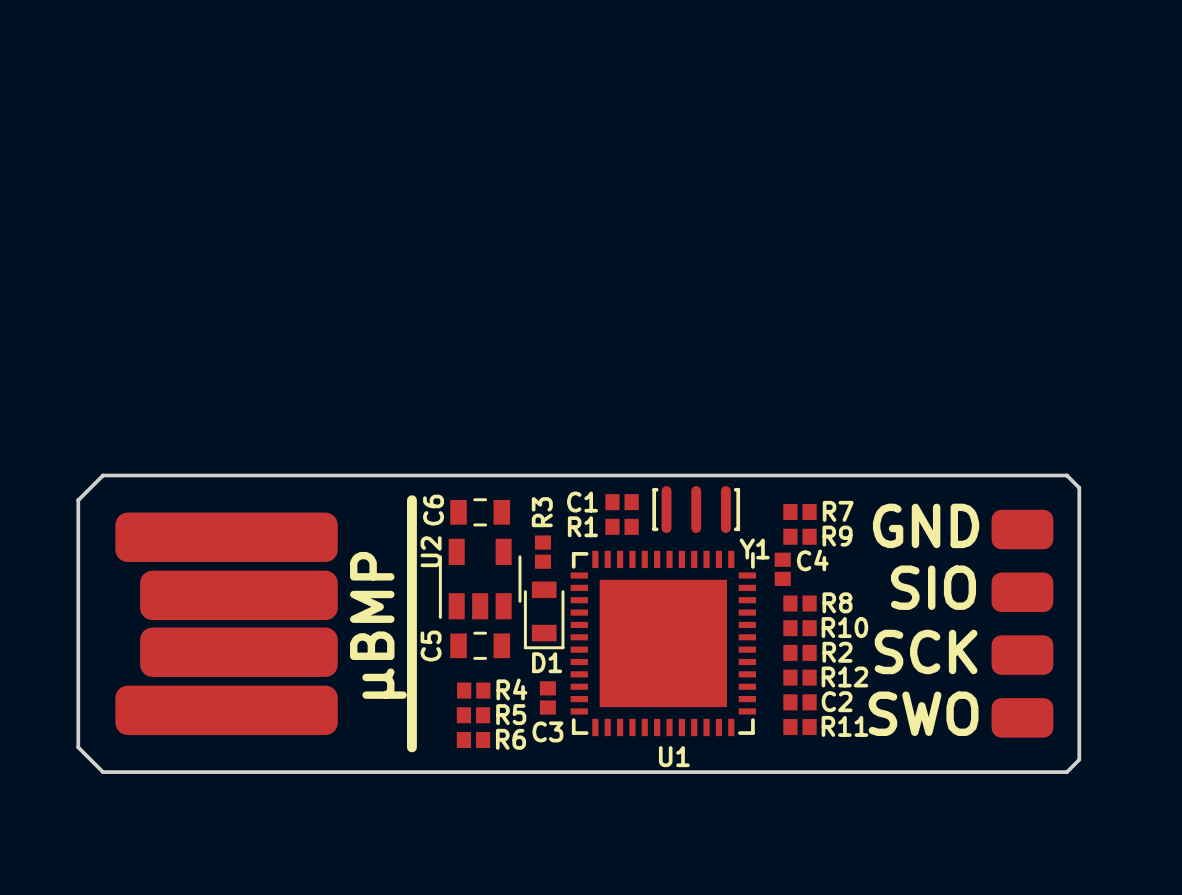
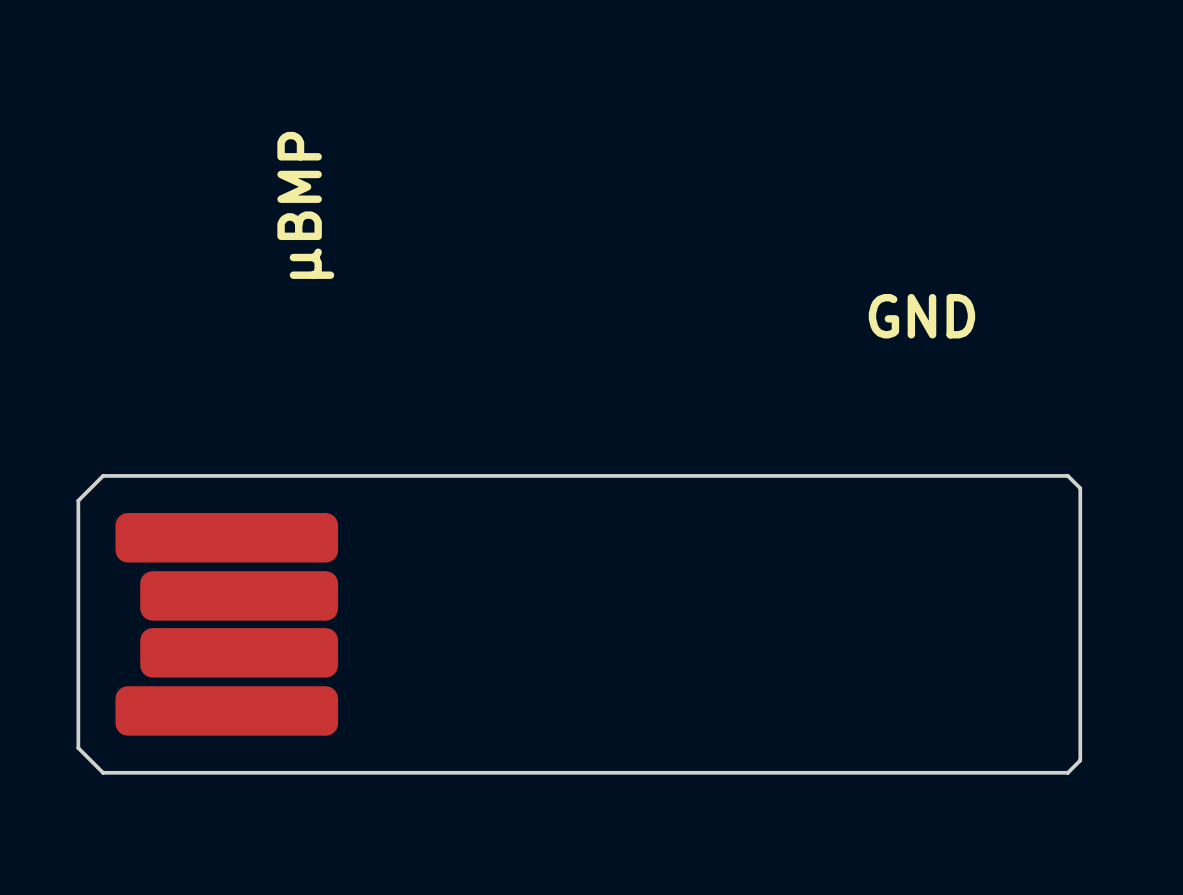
line: (411, 500) (411, 747) -> none
R1: (622, 502) -> none
Y1: (696, 509) -> none
C6: (480, 512) -> none
R7: (800, 512) -> none
text position: GND (926, 525) -> GND (921, 316)
C1: (622, 526) -> none
R9: (800, 536) -> none
R3: (542, 552) -> none
C4: (782, 569) -> none
U2: (480, 579) -> none
text: SIO (933, 587) -> none
R8: (800, 603) -> none
D1: (544, 615) -> none
part: (1022, 623) -> none
text position: µBMP (378, 625) -> µBMP (305, 205)
R10: (800, 628) -> none
U1: (663, 643) -> none
C5: (480, 645) -> none
text: SCK (926, 651) -> none
R2: (800, 652) -> none
R12: (800, 677) -> none
R4: (473, 690) -> none
C3: (547, 697) -> none
R11: (800, 702) -> none
text: SWO (923, 713) -> none
R5: (473, 715) -> none
C2: (800, 727) -> none
R6: (473, 739) -> none

